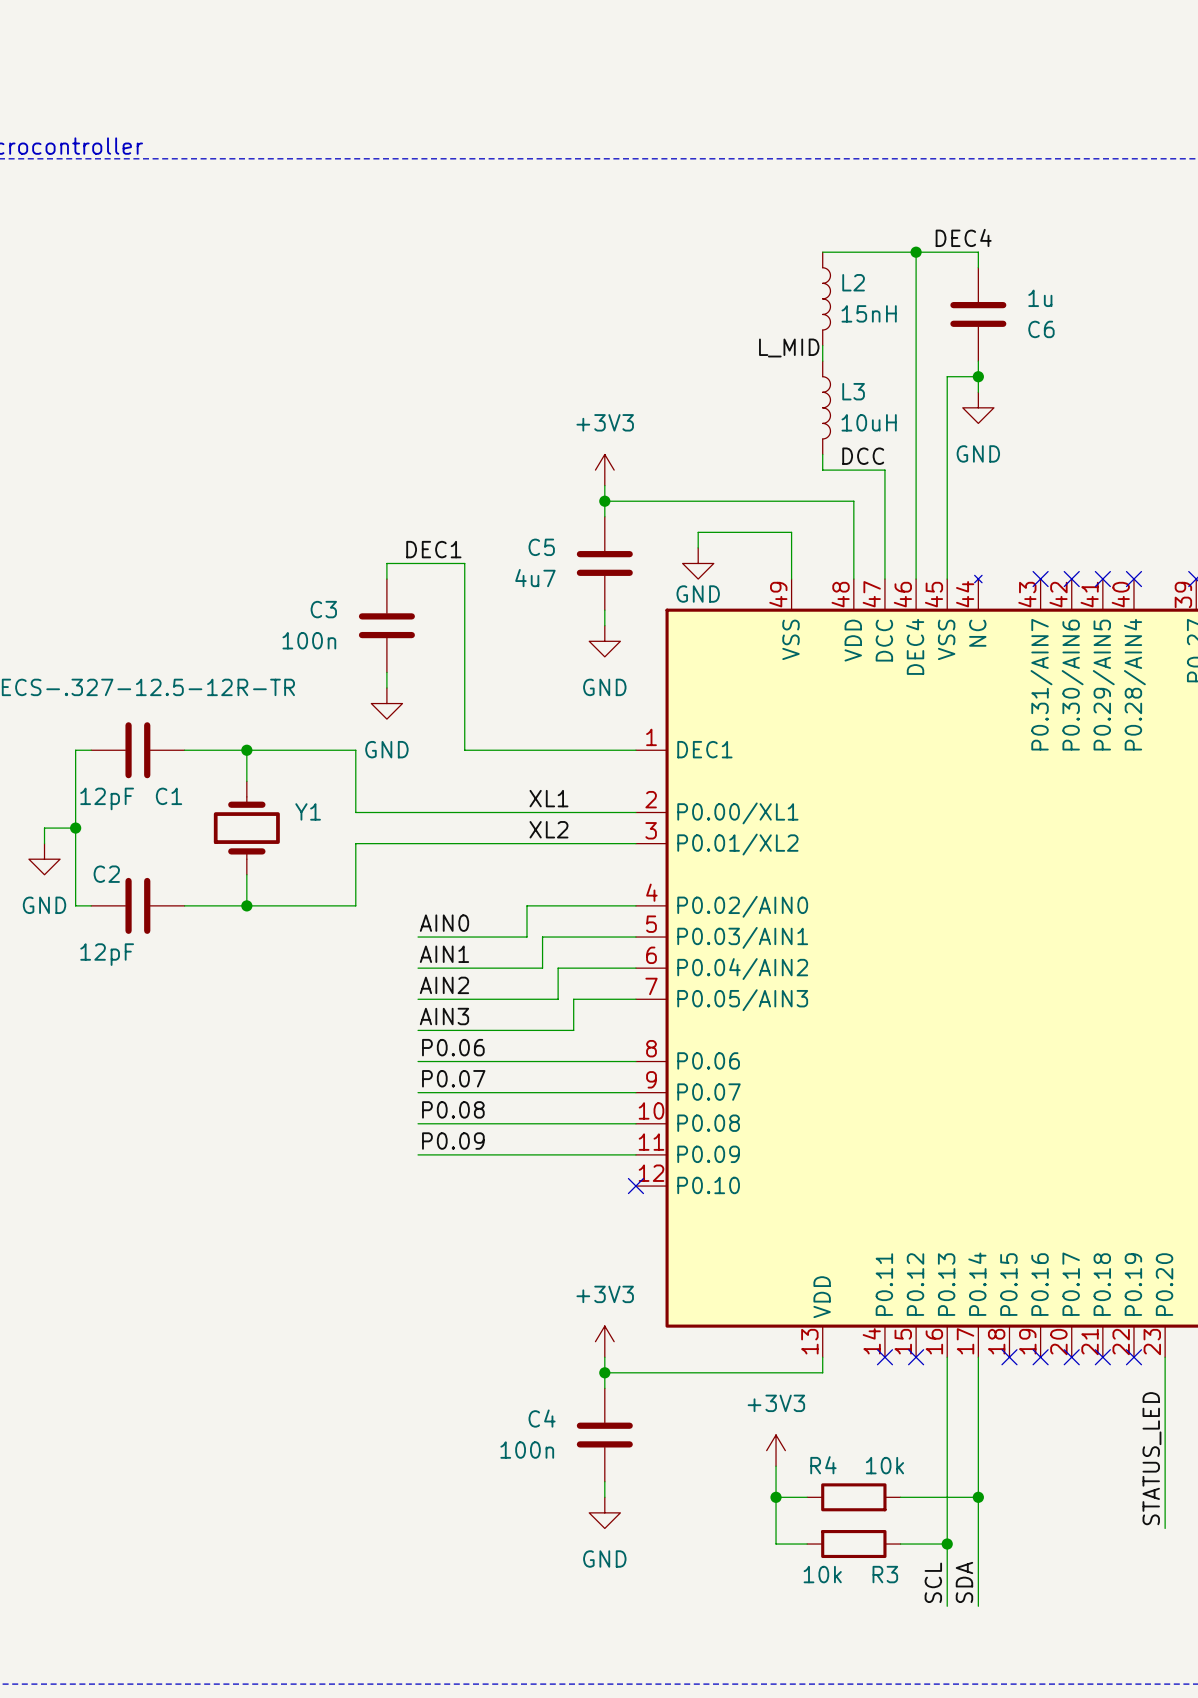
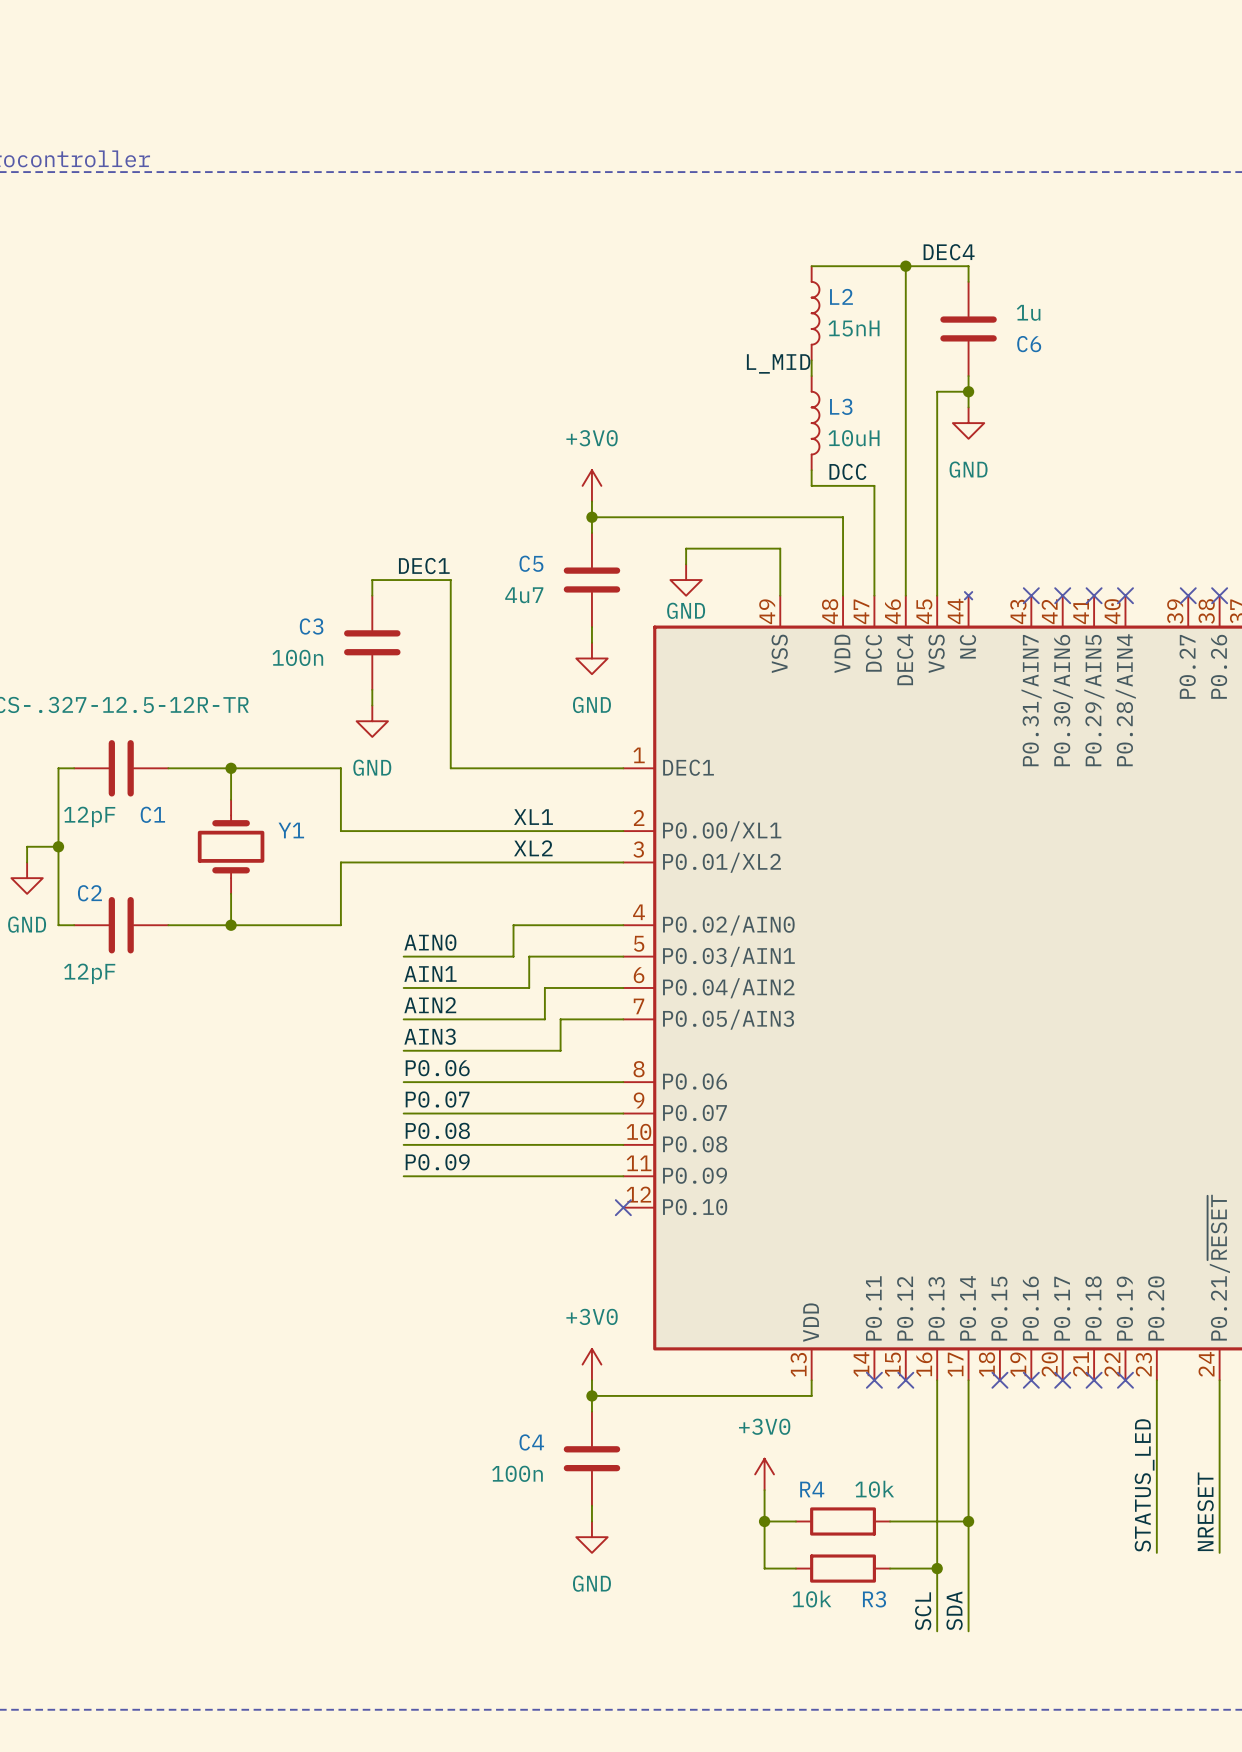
power symbol: +3V3 (604, 470) -> +3V0 (591, 485)
power symbol: +3V3 (604, 1341) -> +3V0 (591, 1364)
power symbol: +3V3 (776, 1450) -> +3V0 (764, 1474)

